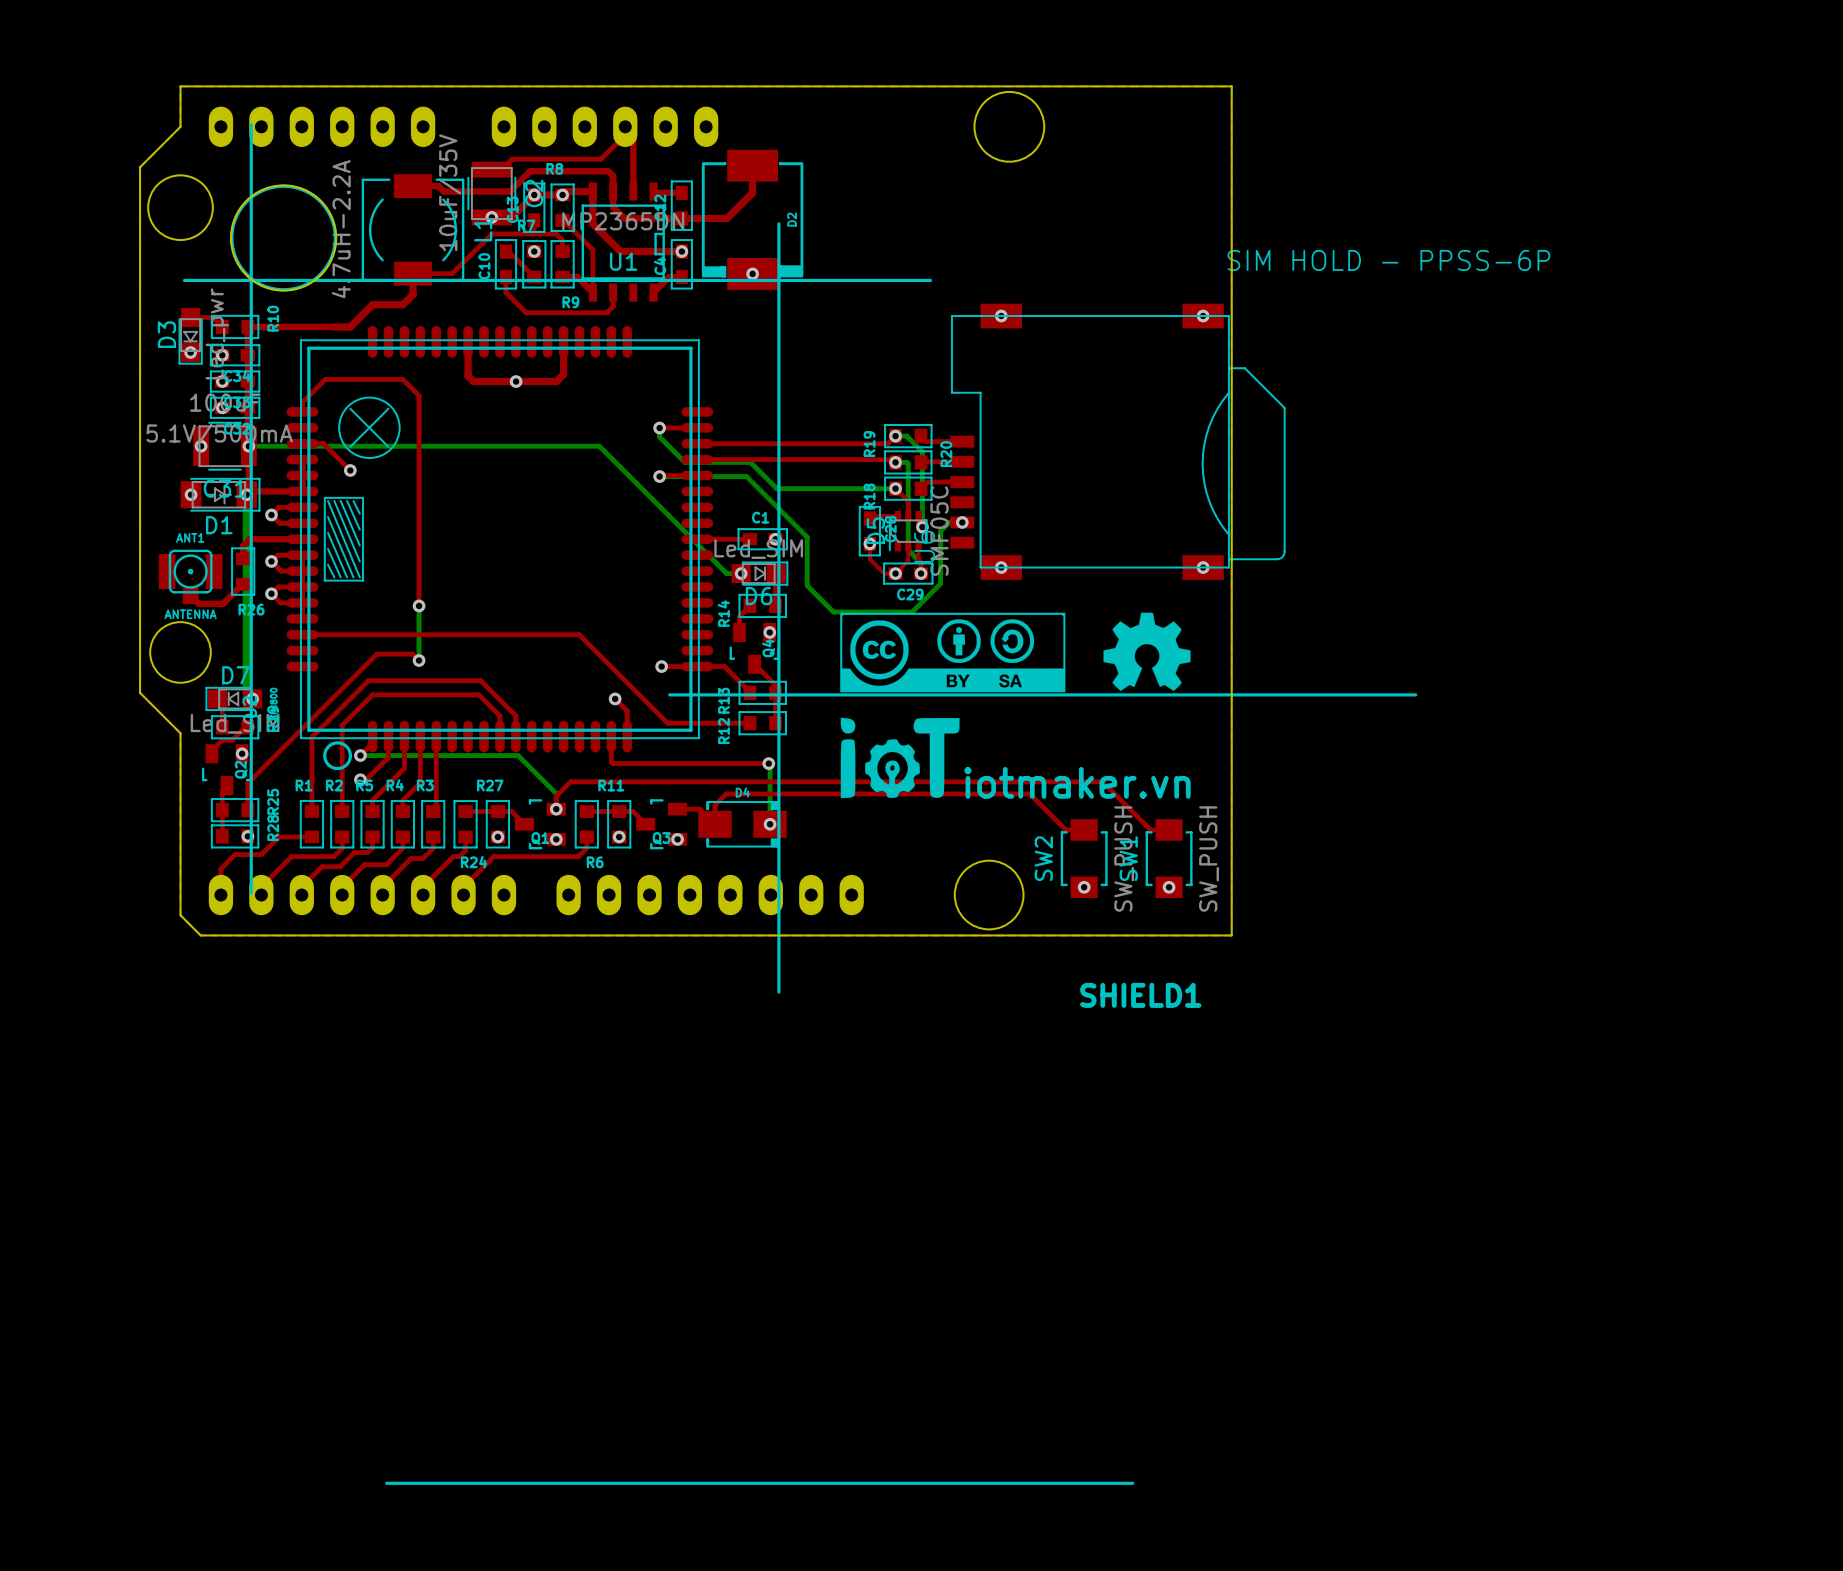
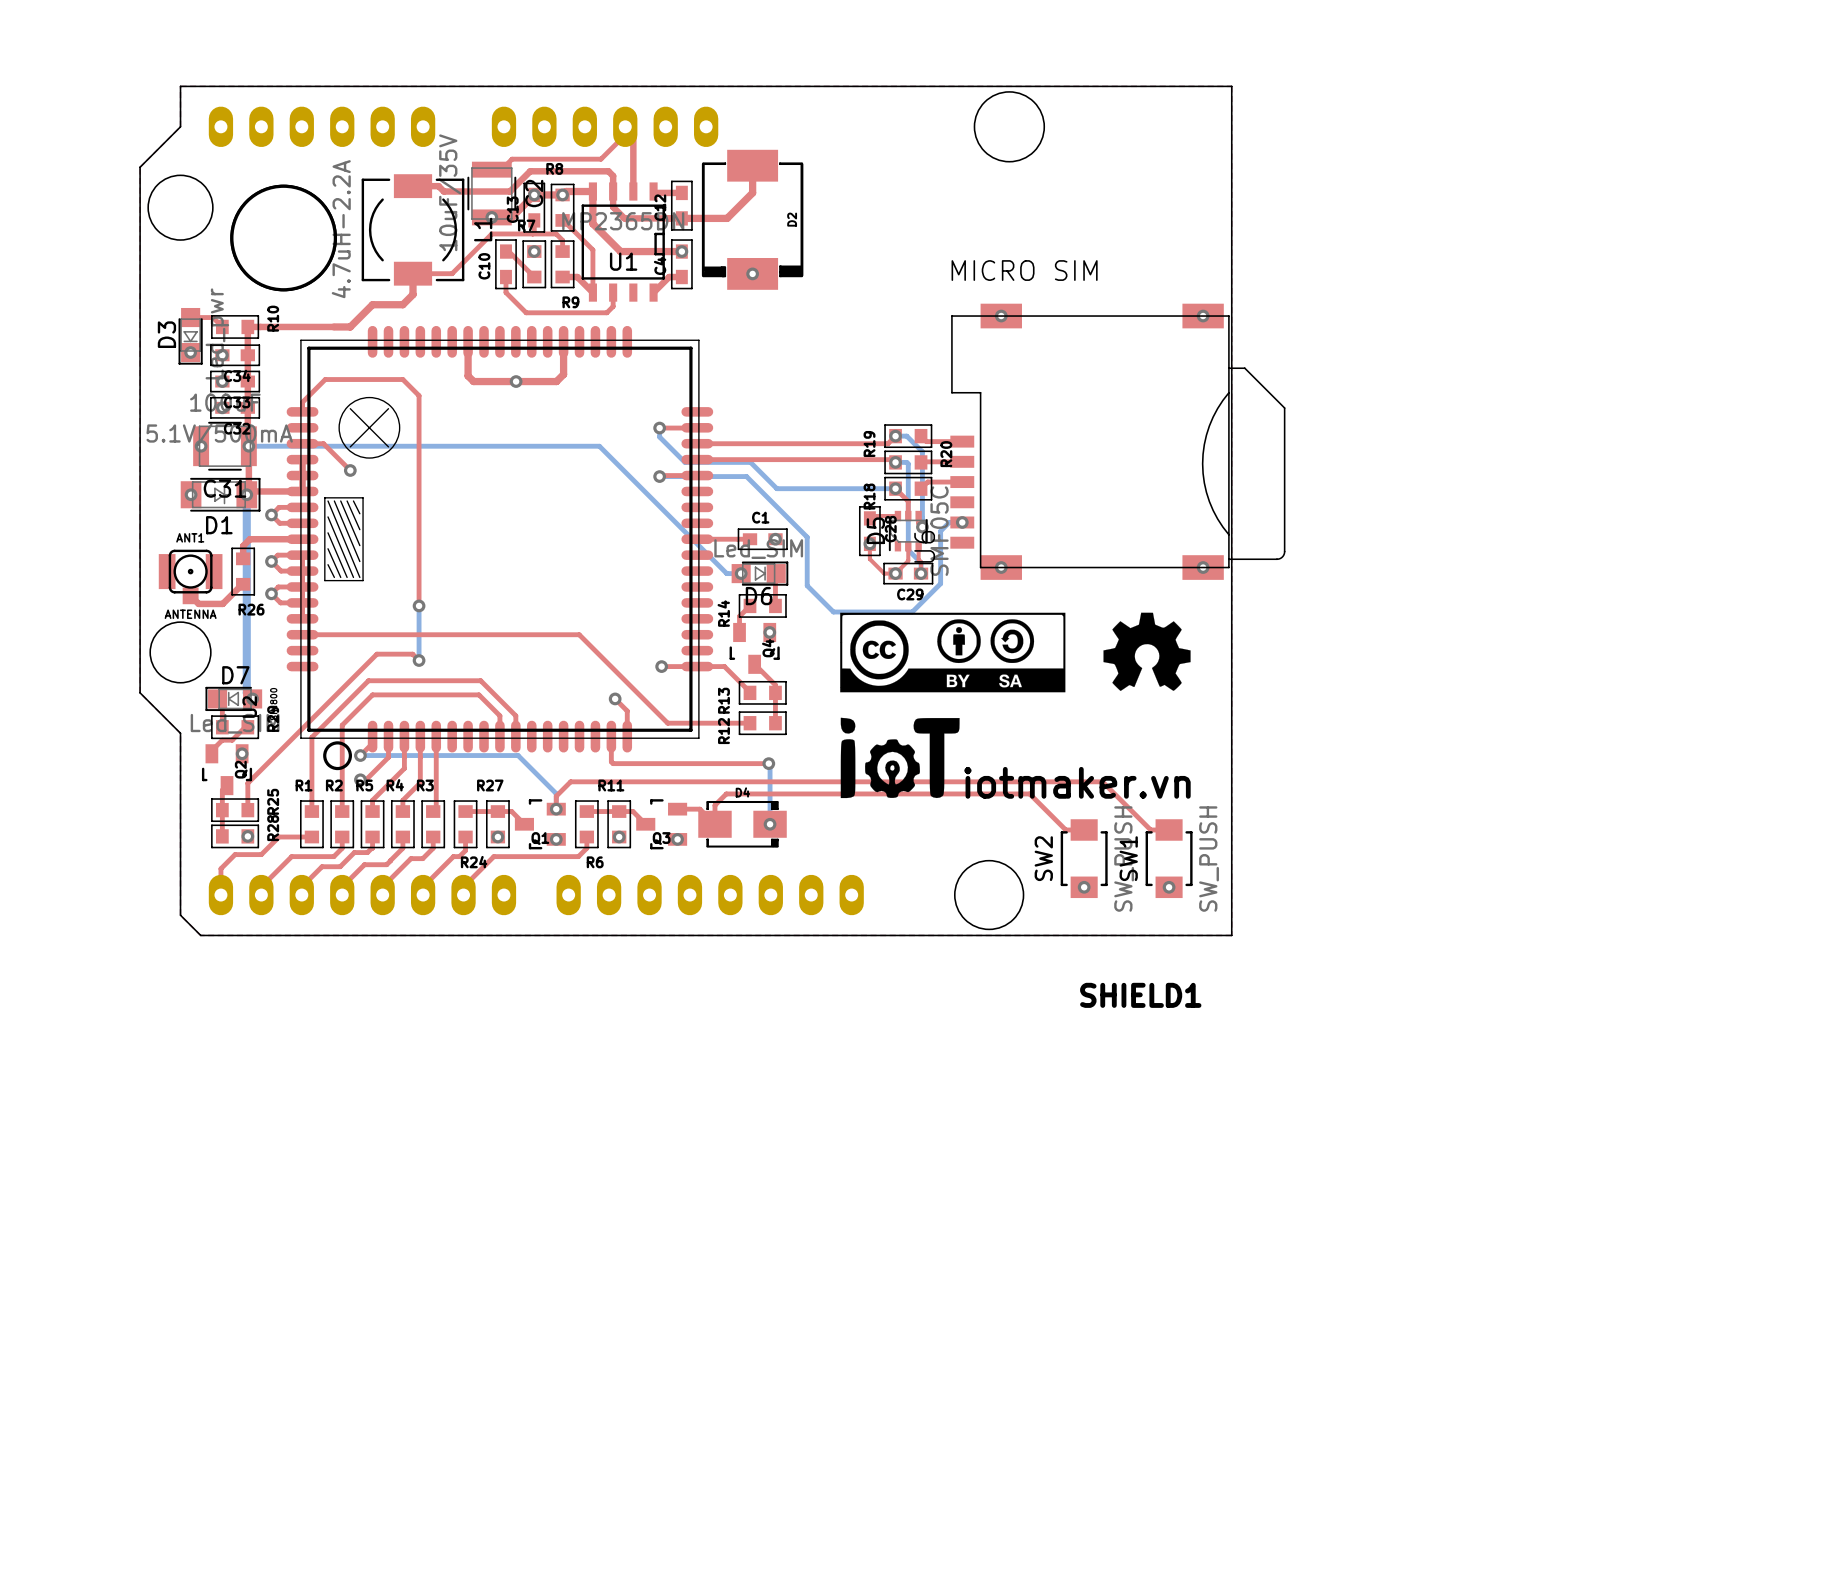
line: (251, 124) (251, 893) -> none
line: (778, 223) (778, 992) -> none
U6 value: SIM HOLD - PPSS-6P (1388, 260) -> MICRO SIM (1024, 270)
line: (184, 280) (930, 280) -> none
line: (669, 694) (1415, 694) -> none
line: (386, 1483) (1132, 1483) -> none

